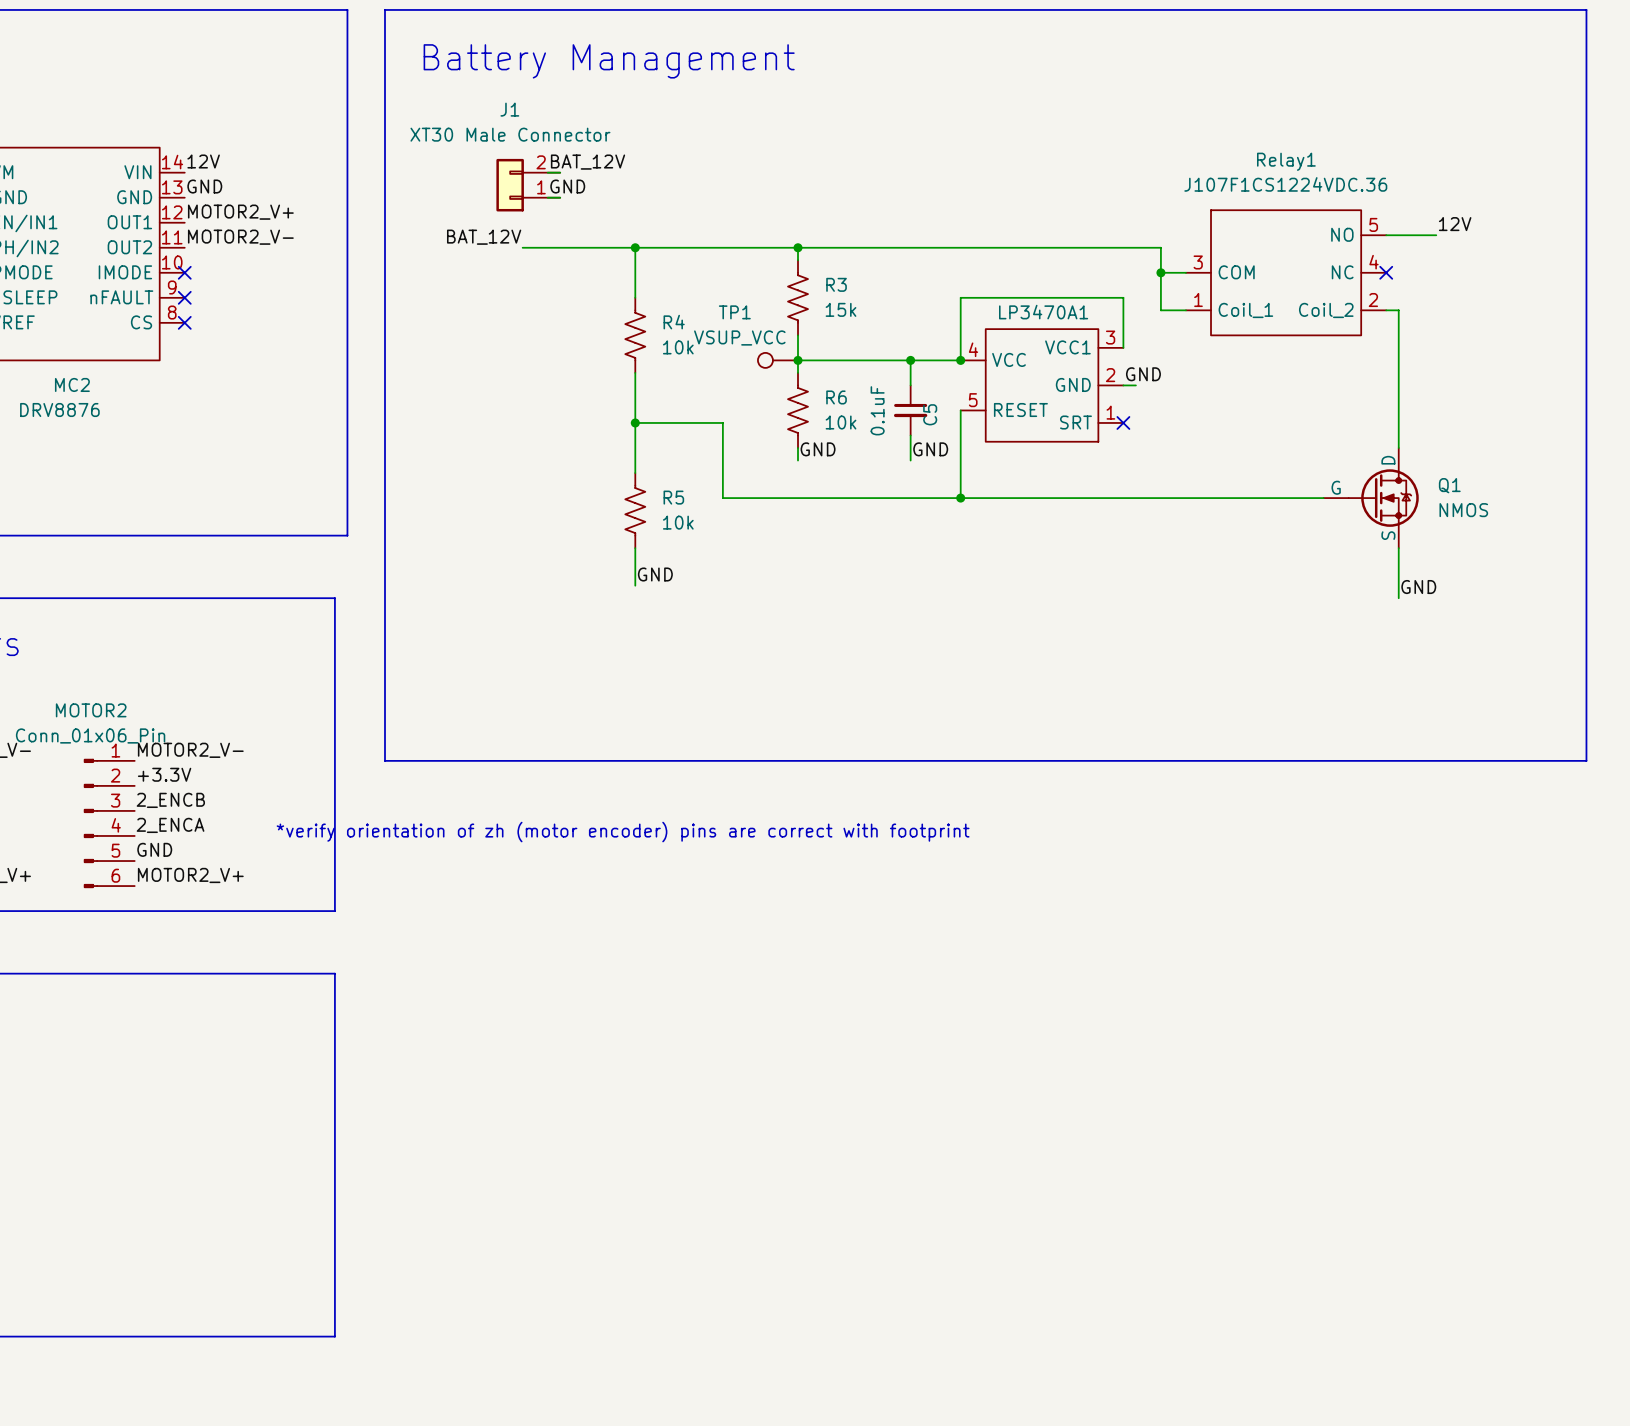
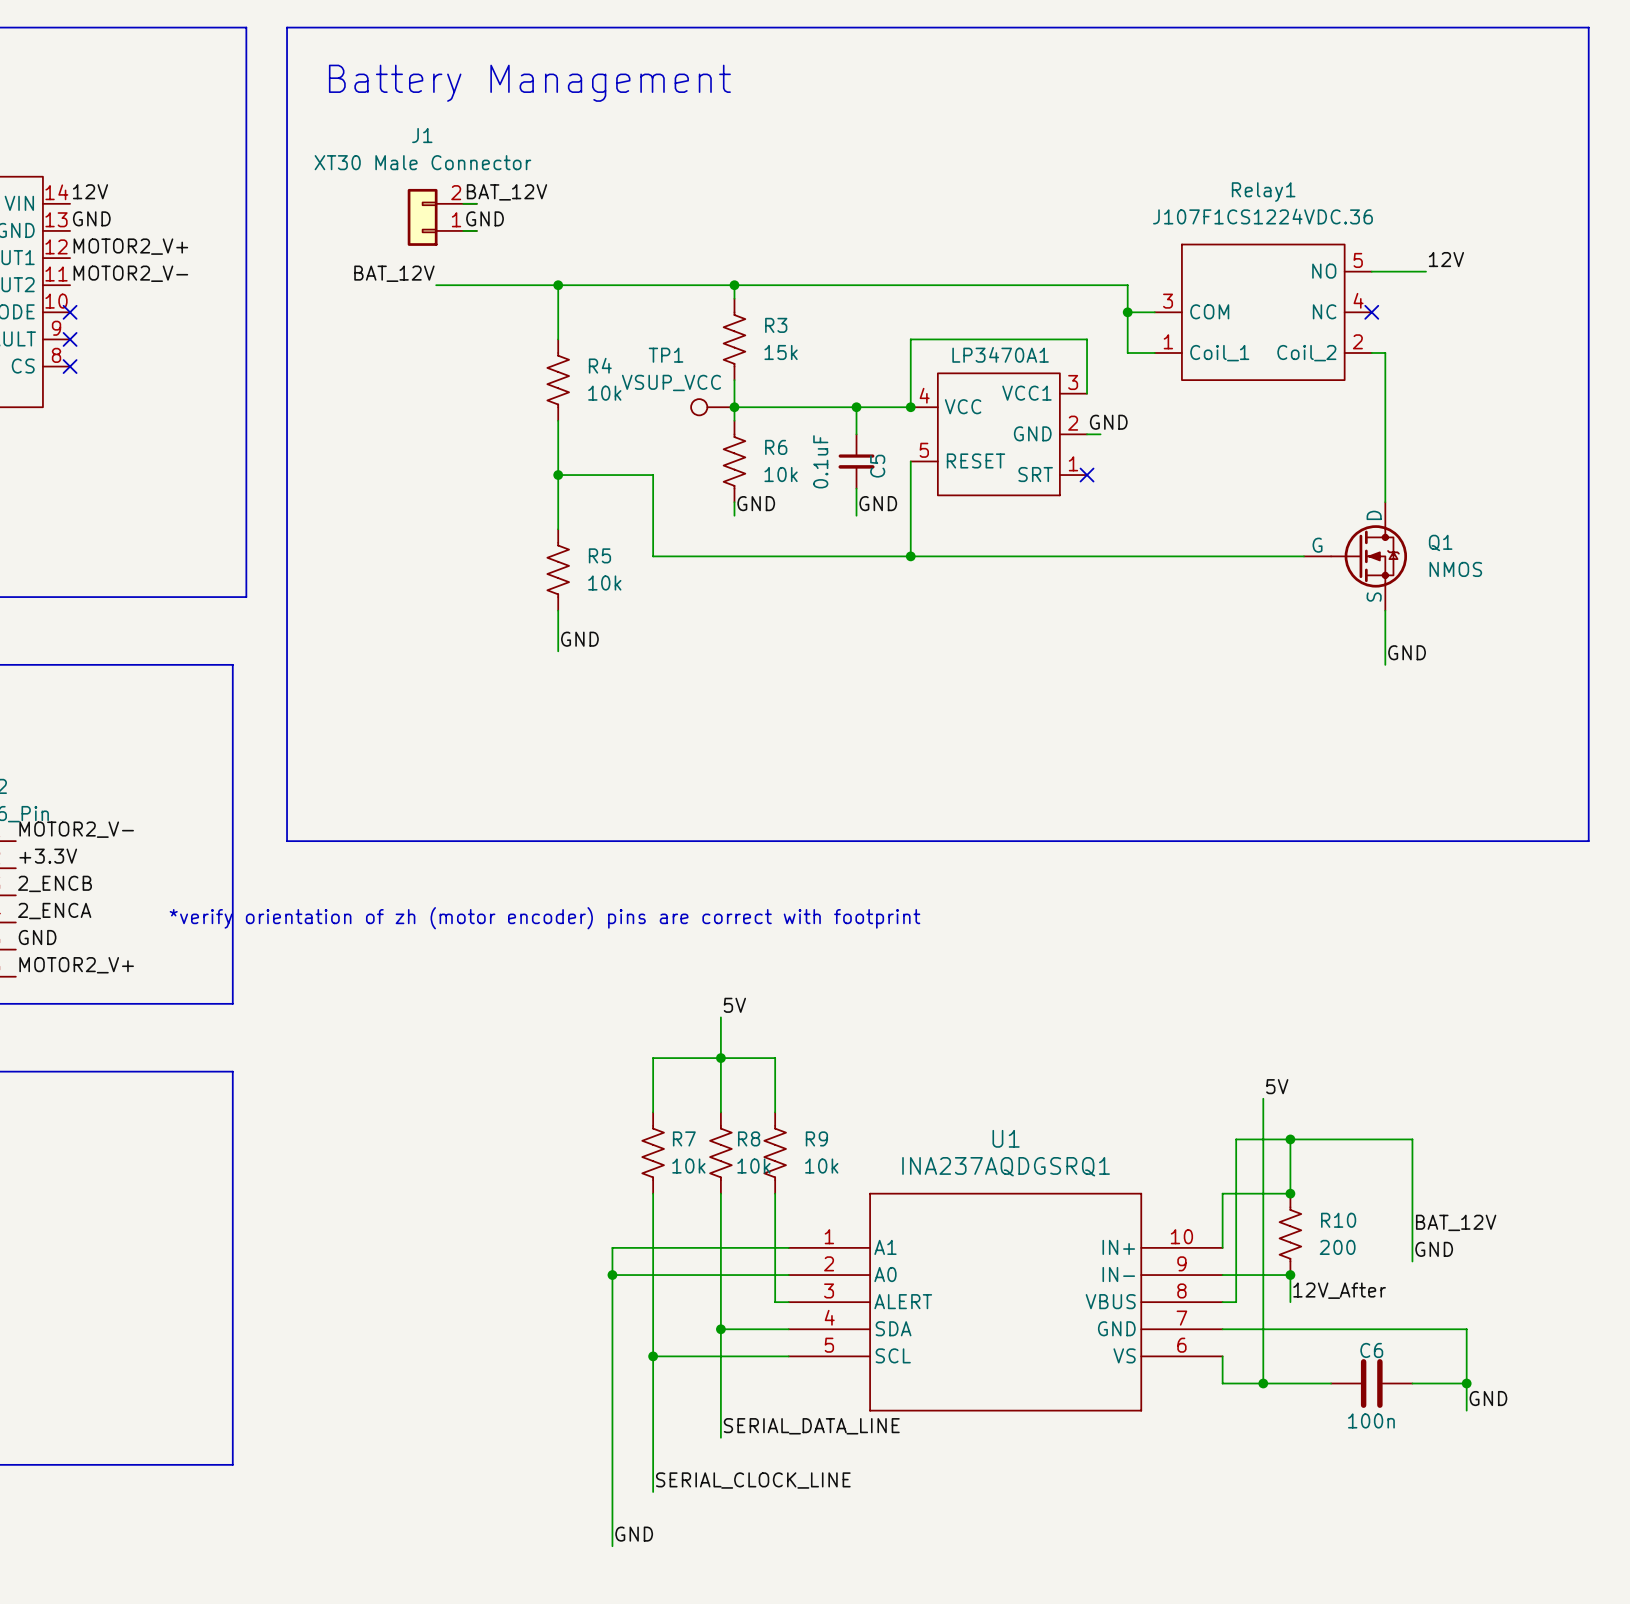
label: none -> 5V (734, 1005)
wire: none -> (720, 1017) (720, 1112)
junction: none -> (720, 1058)
label: none -> 5V (1277, 1086)
wire: none -> (1263, 1098) (1263, 1383)
wire: none -> (653, 1112) (653, 1058) (775, 1058) (775, 1112)
wire: none -> (1290, 1139) (1290, 1193) (1222, 1193) (1222, 1247)
junction: none -> (1290, 1139)
R7: none -> 10k (653, 1152)
R8: none -> 10k (720, 1152)
R9: none -> 10k (775, 1152)
wire: none -> (653, 1193) (653, 1491)
wire: none -> (720, 1193) (720, 1437)
wire: none -> (775, 1193) (775, 1302) (788, 1302)
junction: none -> (1290, 1193)
label: none -> BAT_12V (1456, 1222)
R10: none -> 200 (1290, 1234)
wire: none -> (788, 1247) (612, 1247) (612, 1546)
label: none -> GND (1434, 1249)
wire: none -> (1412, 1261) (1412, 1139) (1236, 1139) (1236, 1302) (1222, 1302)
wire: none -> (612, 1275) (788, 1275)
junction: none -> (612, 1275)
wire: none -> (1222, 1275) (1290, 1275) (1290, 1302)
junction: none -> (1290, 1275)
label: none -> 12V_After (1339, 1290)
U1: none -> INA237AQDGSRQ1 (1005, 1302)
wire: none -> (720, 1329) (788, 1329)
junction: none -> (720, 1329)
wire: none -> (1222, 1329) (1466, 1329) (1466, 1410)
wire: none -> (653, 1356) (788, 1356)
junction: none -> (653, 1356)
wire: none -> (1222, 1356) (1222, 1383) (1331, 1383)
junction: none -> (1263, 1383)
C6: none -> 100n (1371, 1383)
wire: none -> (1412, 1383) (1466, 1383)
junction: none -> (1466, 1383)
label: none -> GND (1488, 1398)
label: none -> SERIAL_DATA_LINE (811, 1426)
label: none -> SERIAL_CLOCK_LINE (753, 1480)
label: none -> GND (634, 1534)

